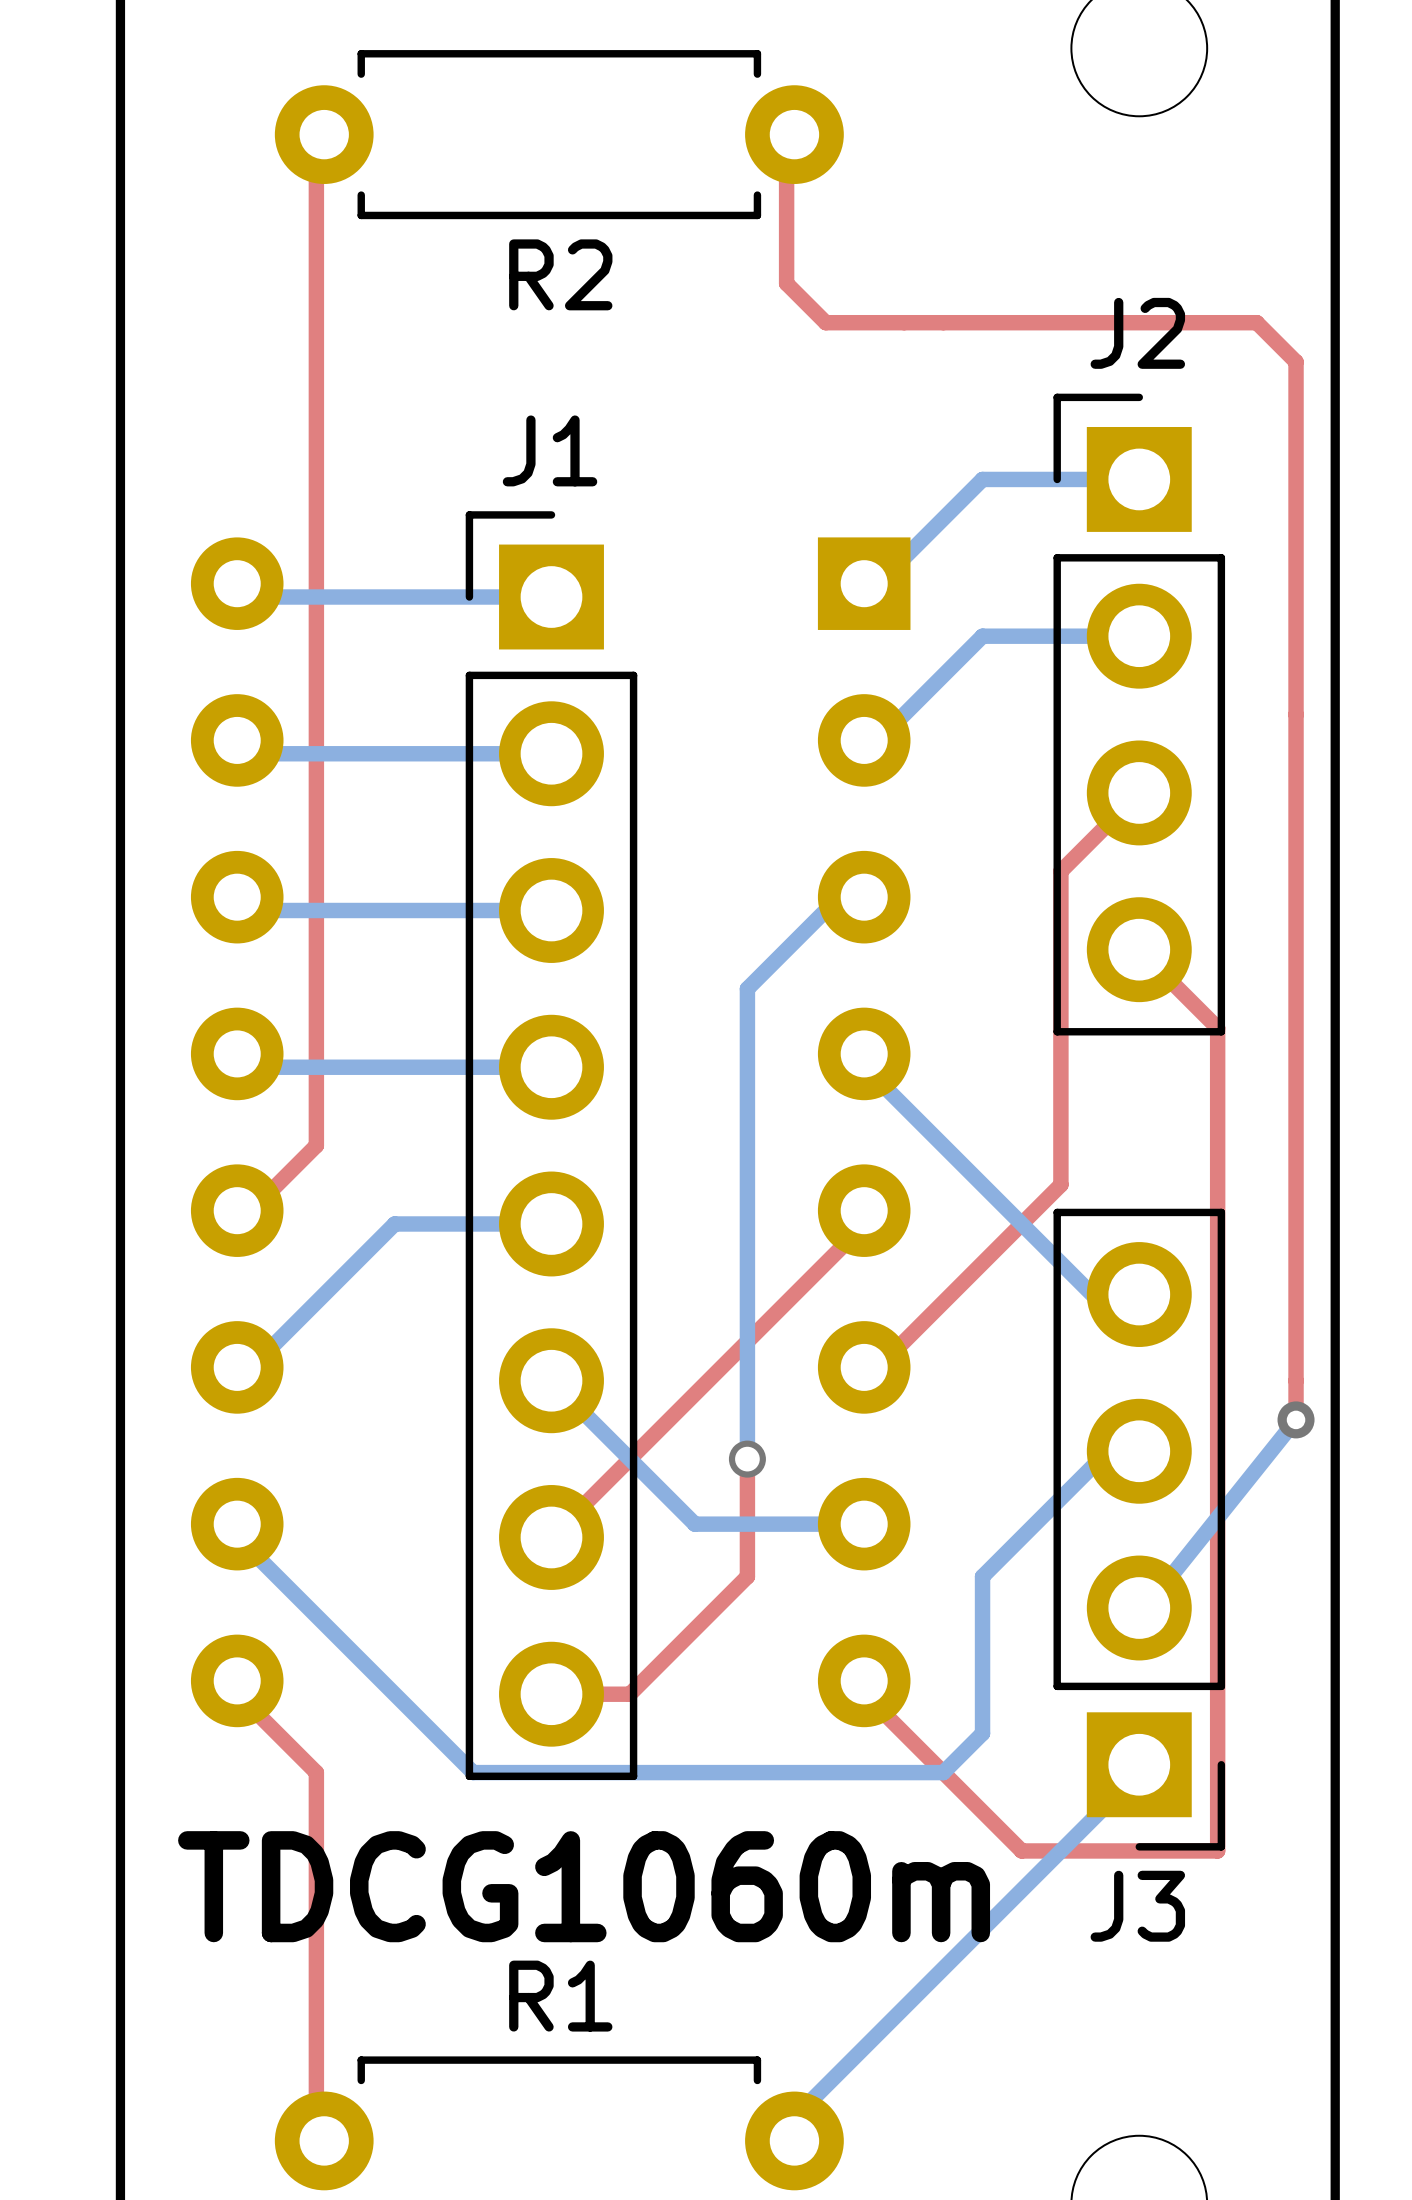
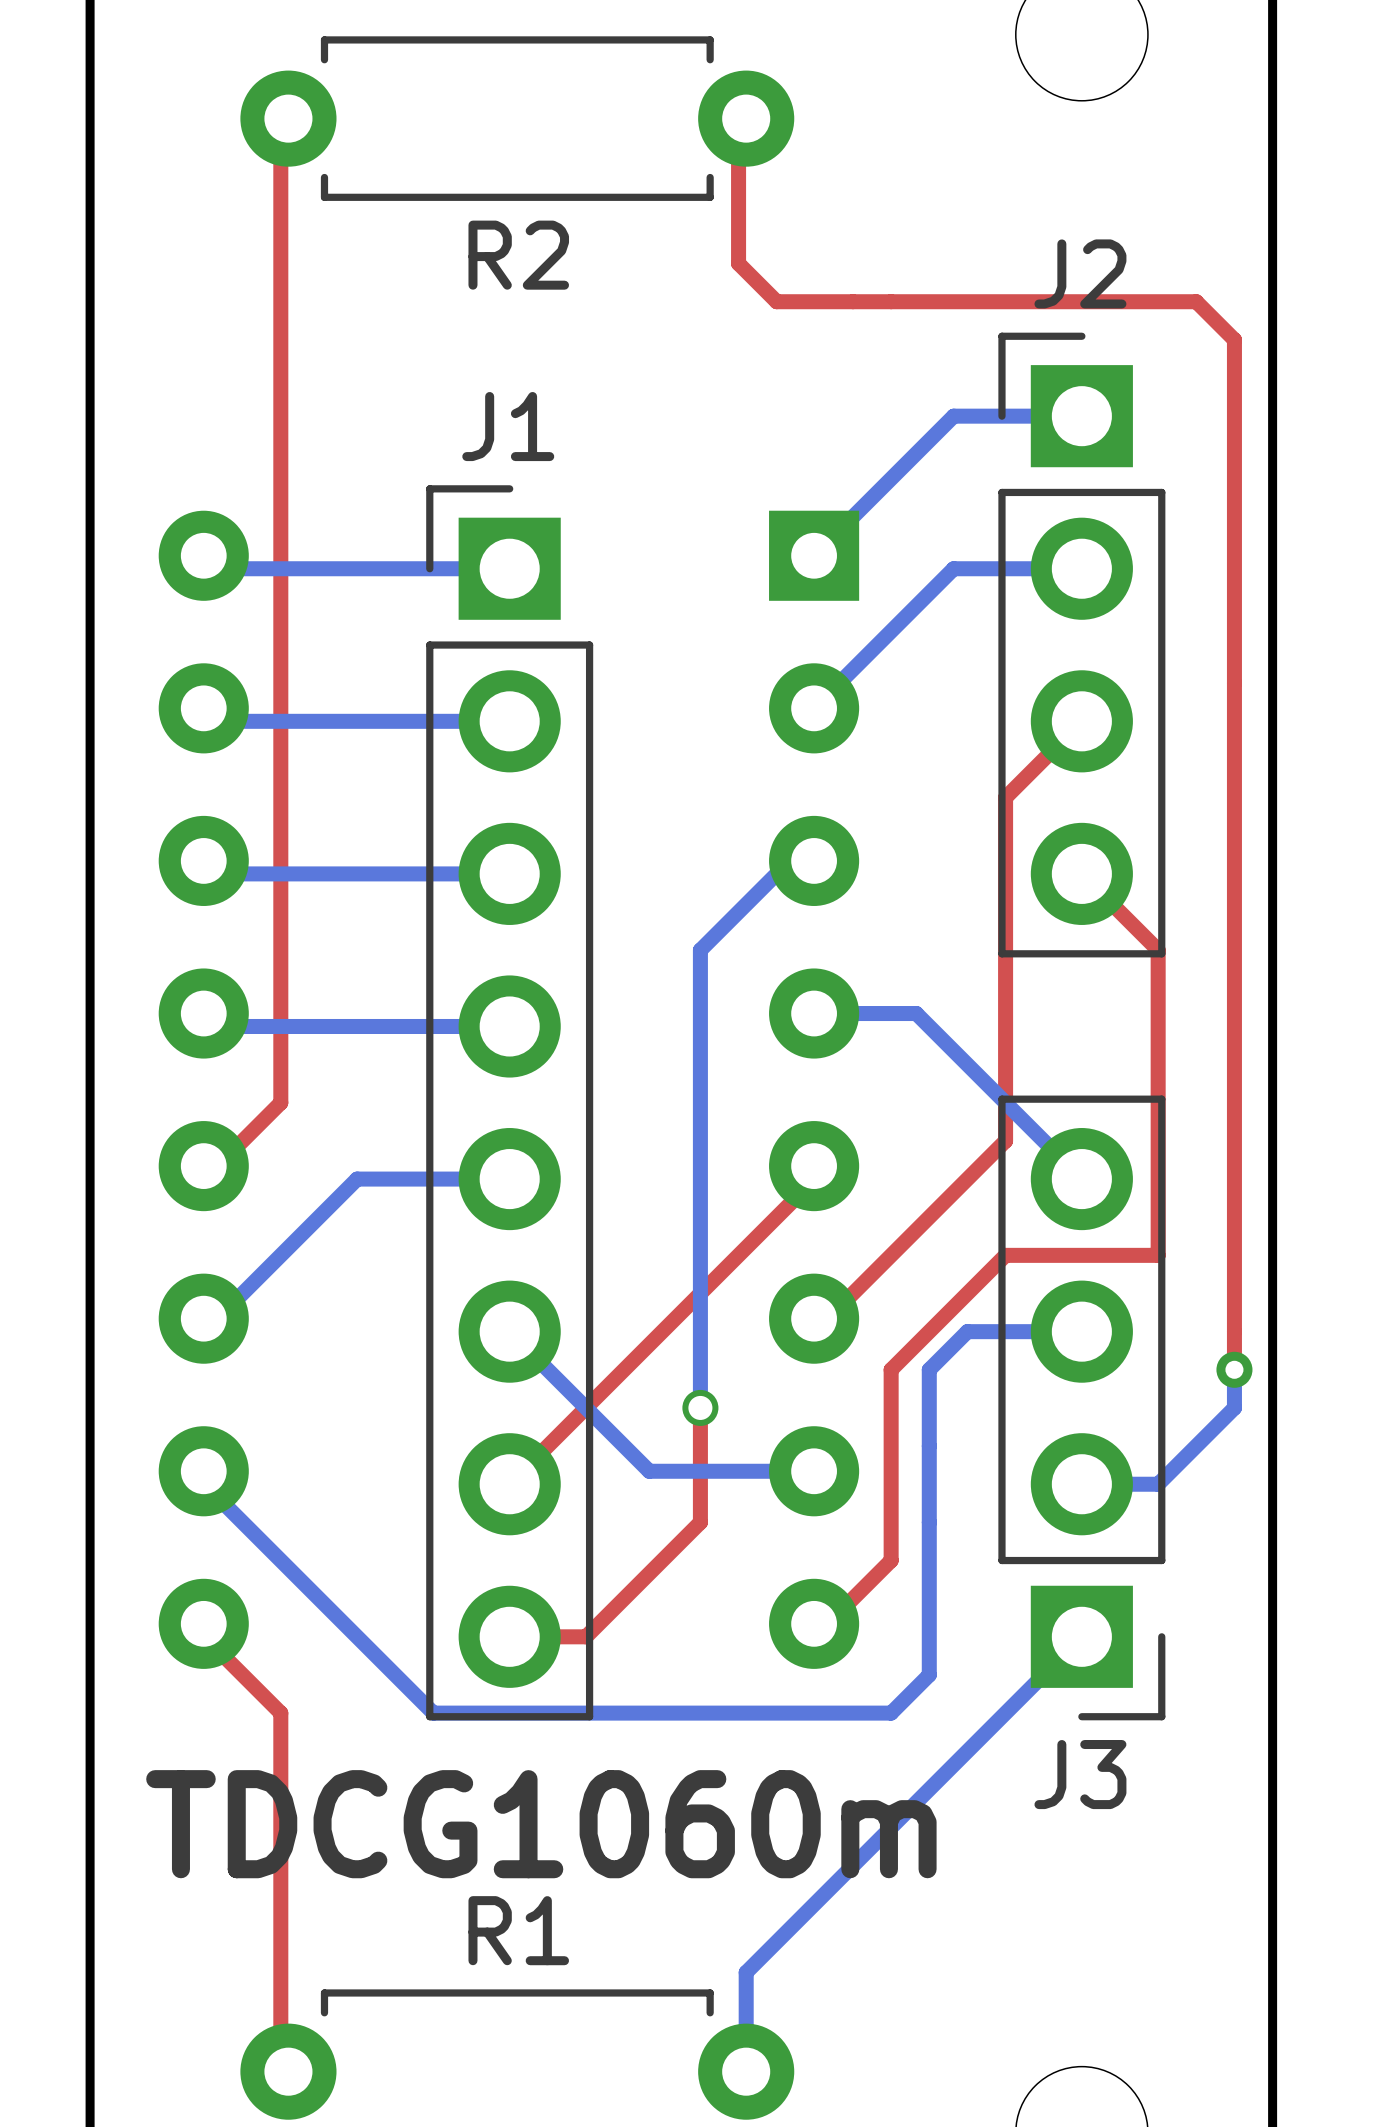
bottom track: none -> (1081, 416) (953, 416) (814, 555)
bottom track: (1139, 479) (982, 479) (864, 597) -> none
bottom track: none -> (1081, 568) (953, 568) (814, 708)
bottom track: (1139, 636) (982, 636) (864, 753) -> none
J2 position: (1139, 714) -> (1081, 645)
top track: (1139, 792) (1060, 871) -> (1081, 721) (1005, 797) (1005, 835)
top track: (1139, 949) (1217, 1028) -> (1081, 873) (1158, 950) (1158, 988)
bottom track: none -> (814, 1013) (916, 1013) (1081, 1179)
bottom track: (864, 1067) (1100, 1302) (1139, 1302) (1139, 1294) -> none
top track: (1217, 1302) (1217, 1850) (1021, 1850) (864, 1694) -> (1158, 1255) (1005, 1255) (891, 1369) (891, 1560) (814, 1636)
bottom track: (1296, 1419) (1139, 1615) (1139, 1608) -> (1234, 1369) (1234, 1407) (1158, 1484) (1081, 1484)
bottom track: (1139, 1451) (1139, 1459) (1100, 1459) (982, 1576) -> (1081, 1331) (967, 1331) (929, 1369) (929, 1522)
J3 position: (1139, 1529) -> (1081, 1407)
bottom track: none -> (1081, 1636) (746, 1972) (746, 2071)
bottom track: (1139, 1764) (1139, 1772) (786, 2125) -> none

